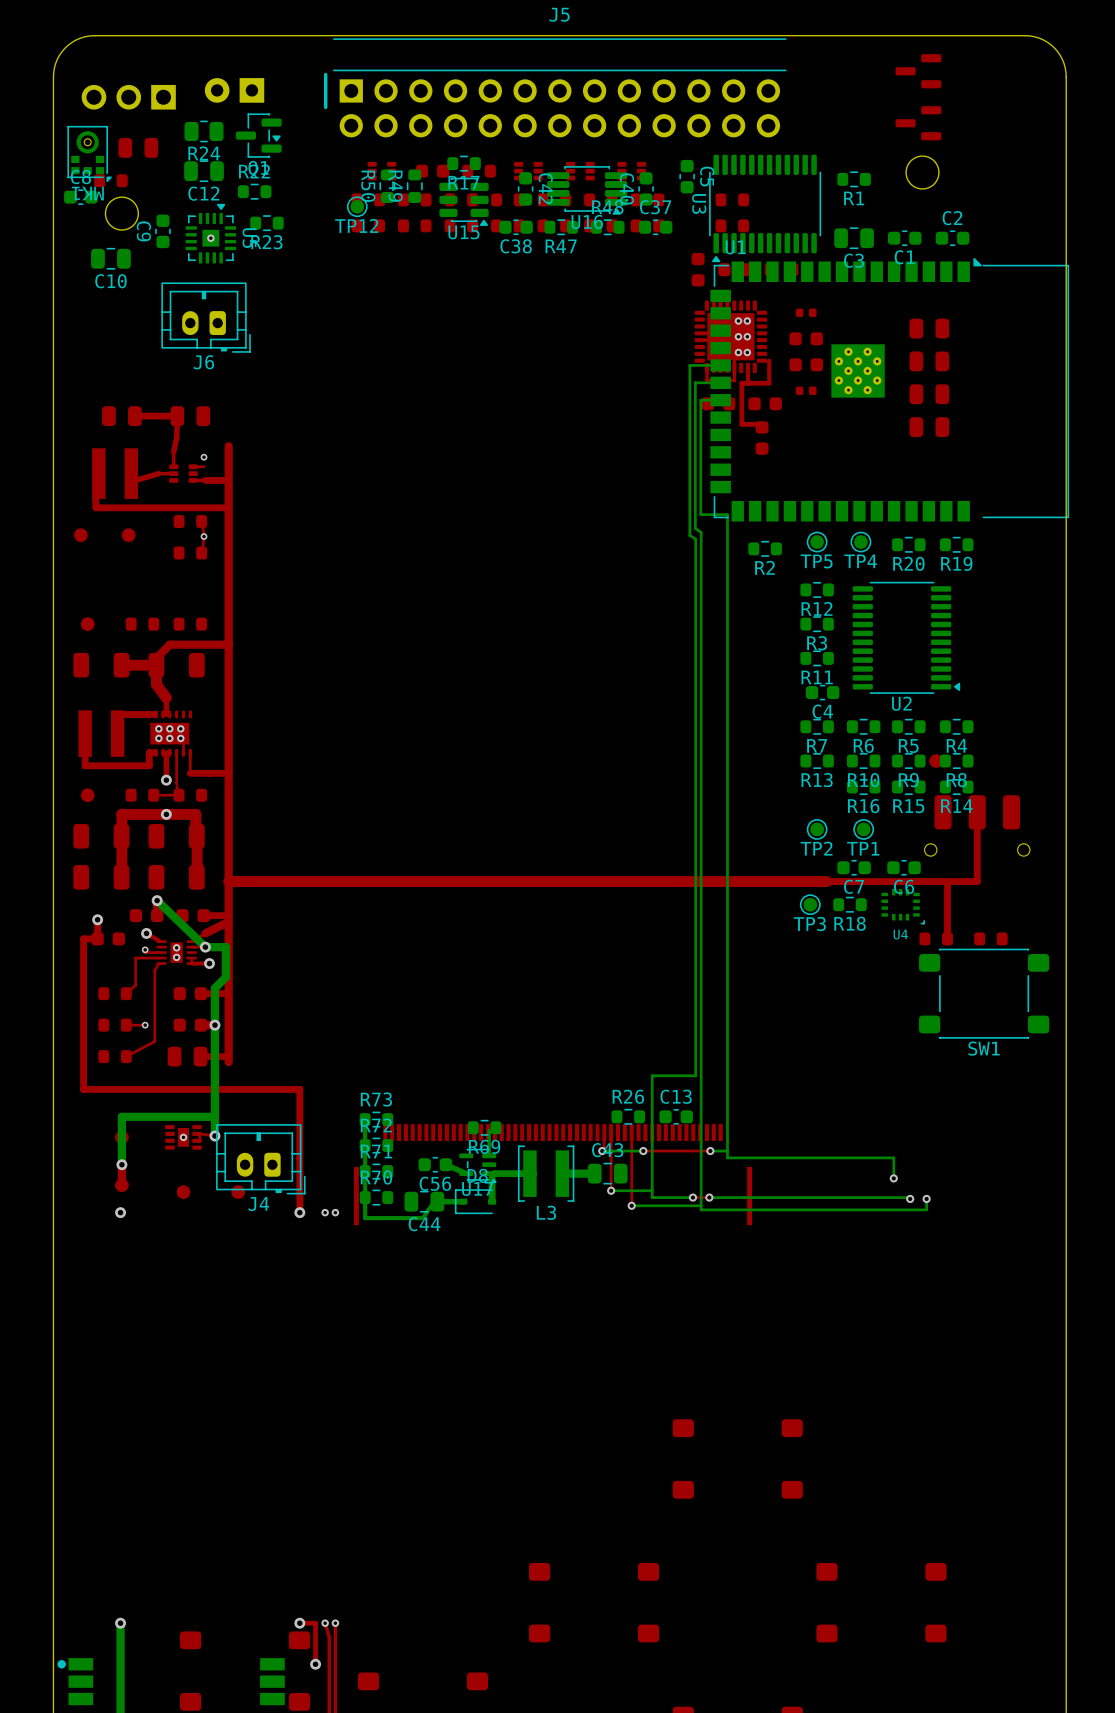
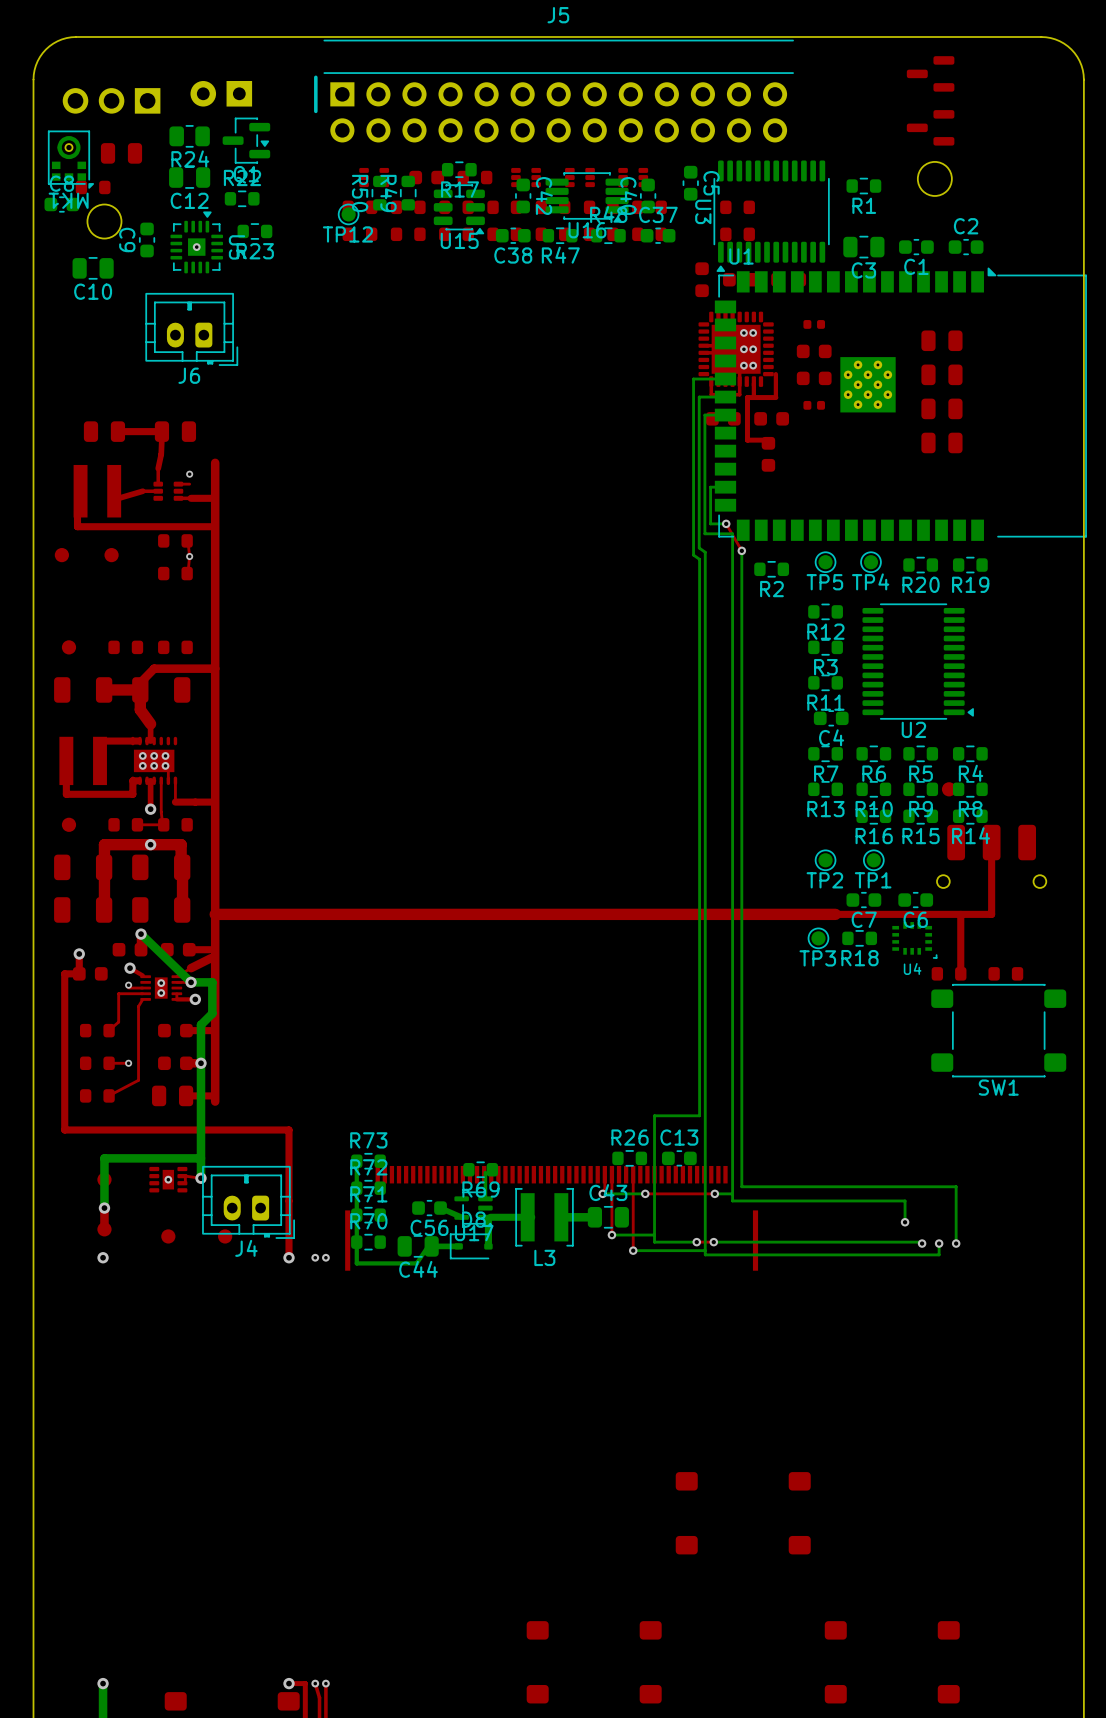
bottom track: none -> (717, 487) (710, 487) (710, 523) (726, 523)
top track: none -> (726, 523) (741, 550)
via: none -> (726, 523)
bottom track: none -> (741, 550) (741, 1186) (956, 1186) (956, 1243)
via: none -> (741, 550)
via: none -> (956, 1243)

